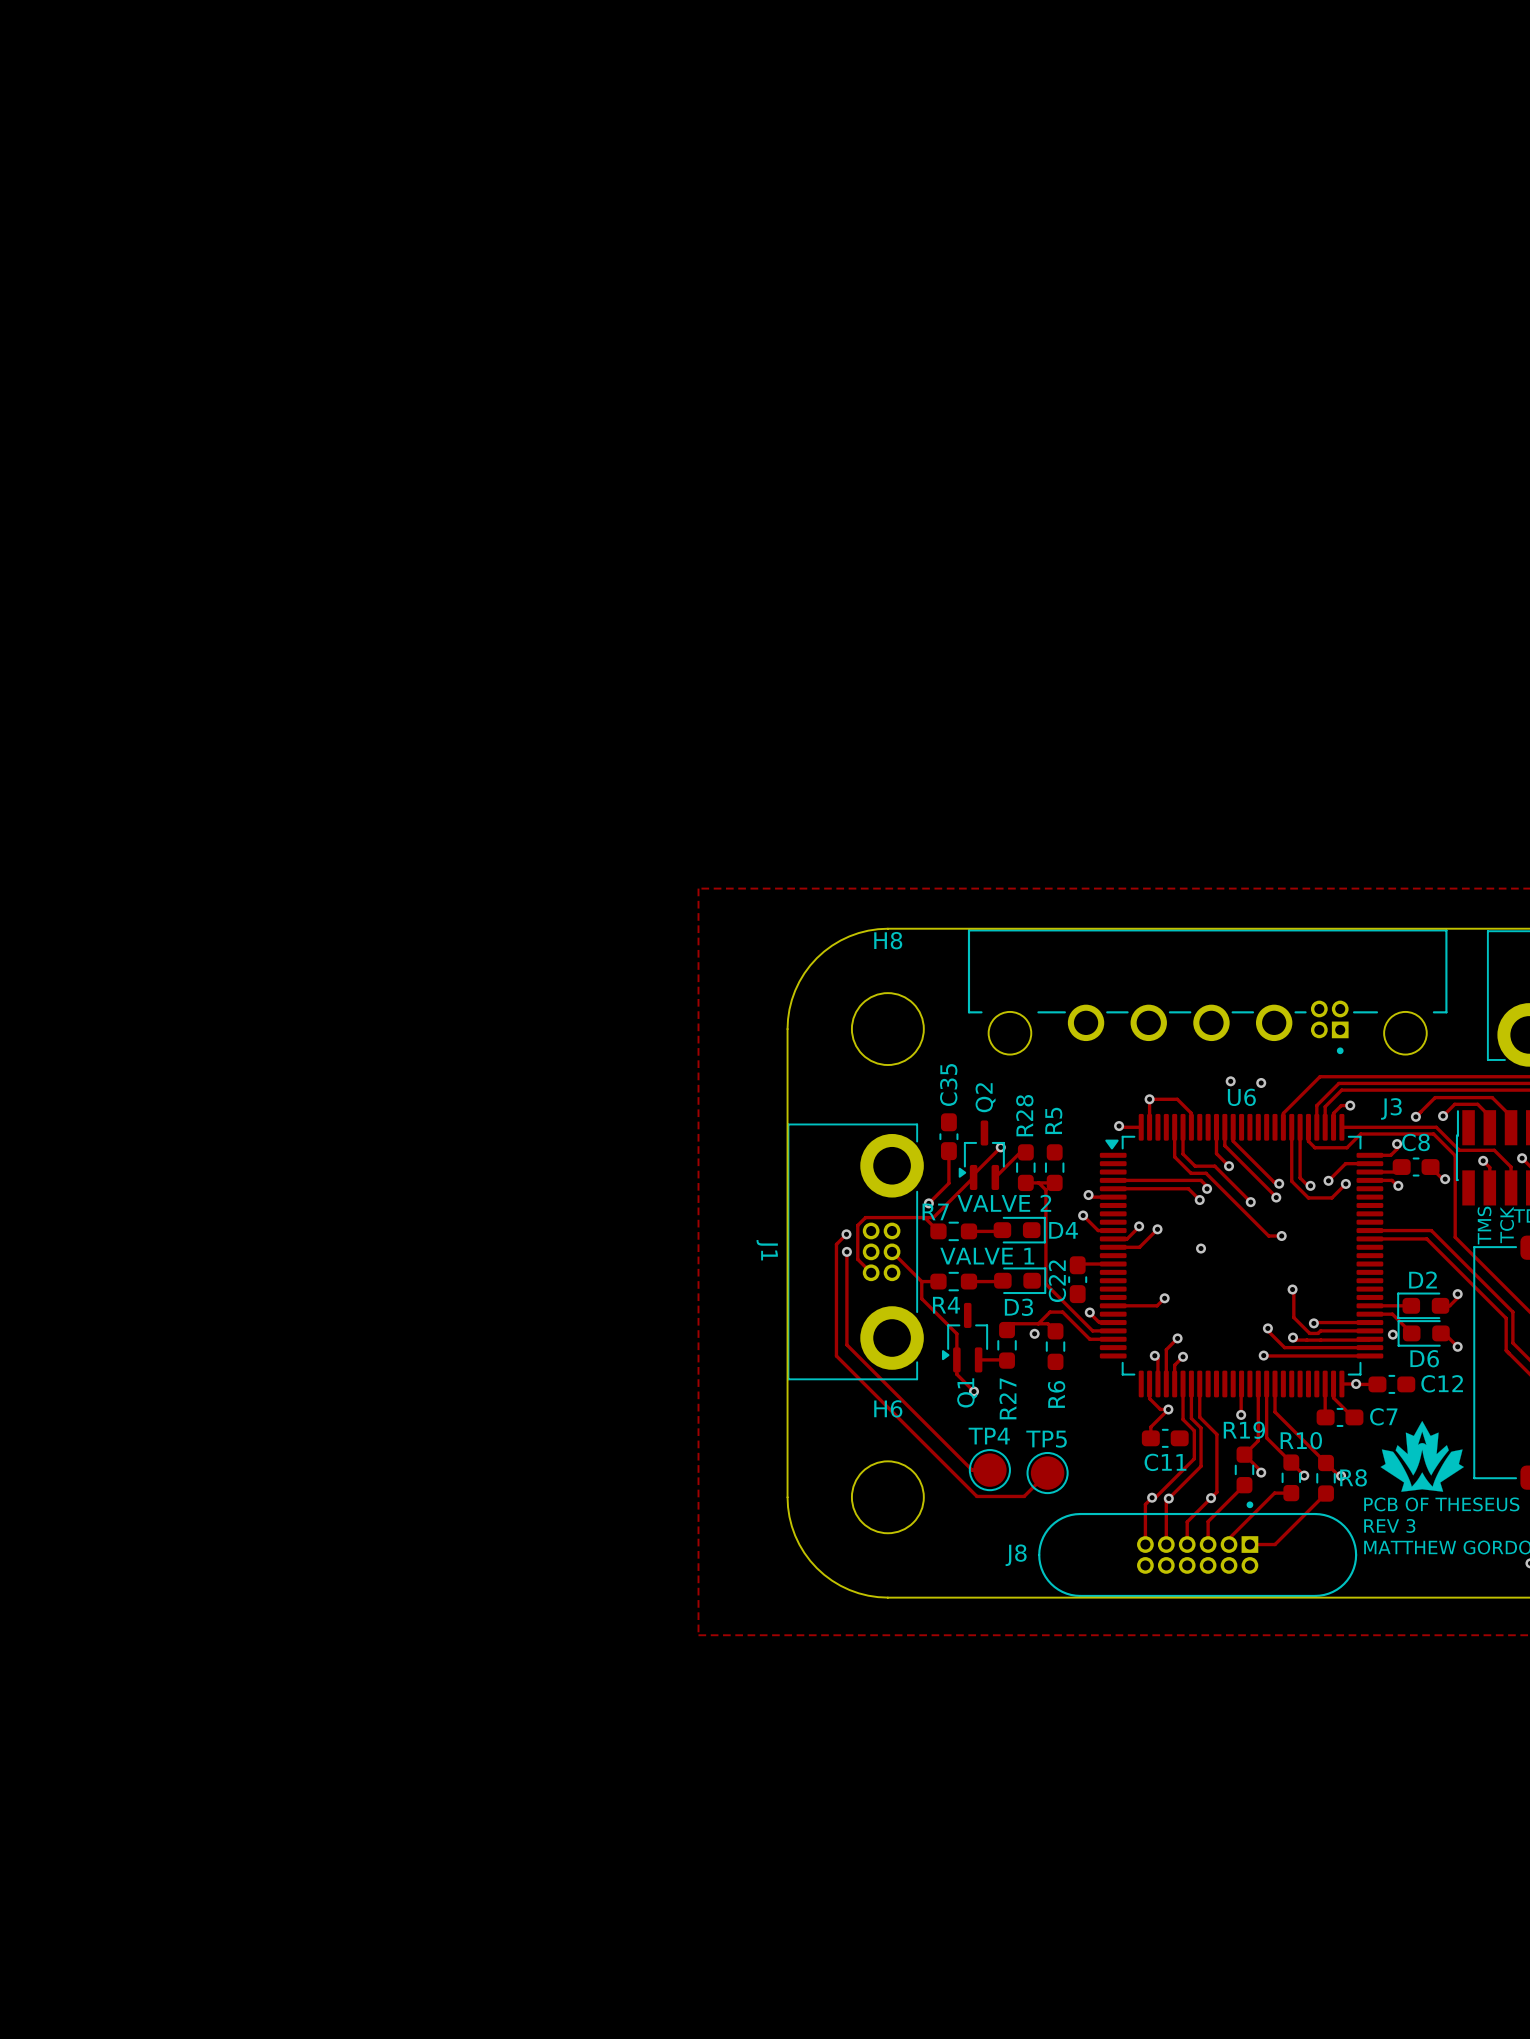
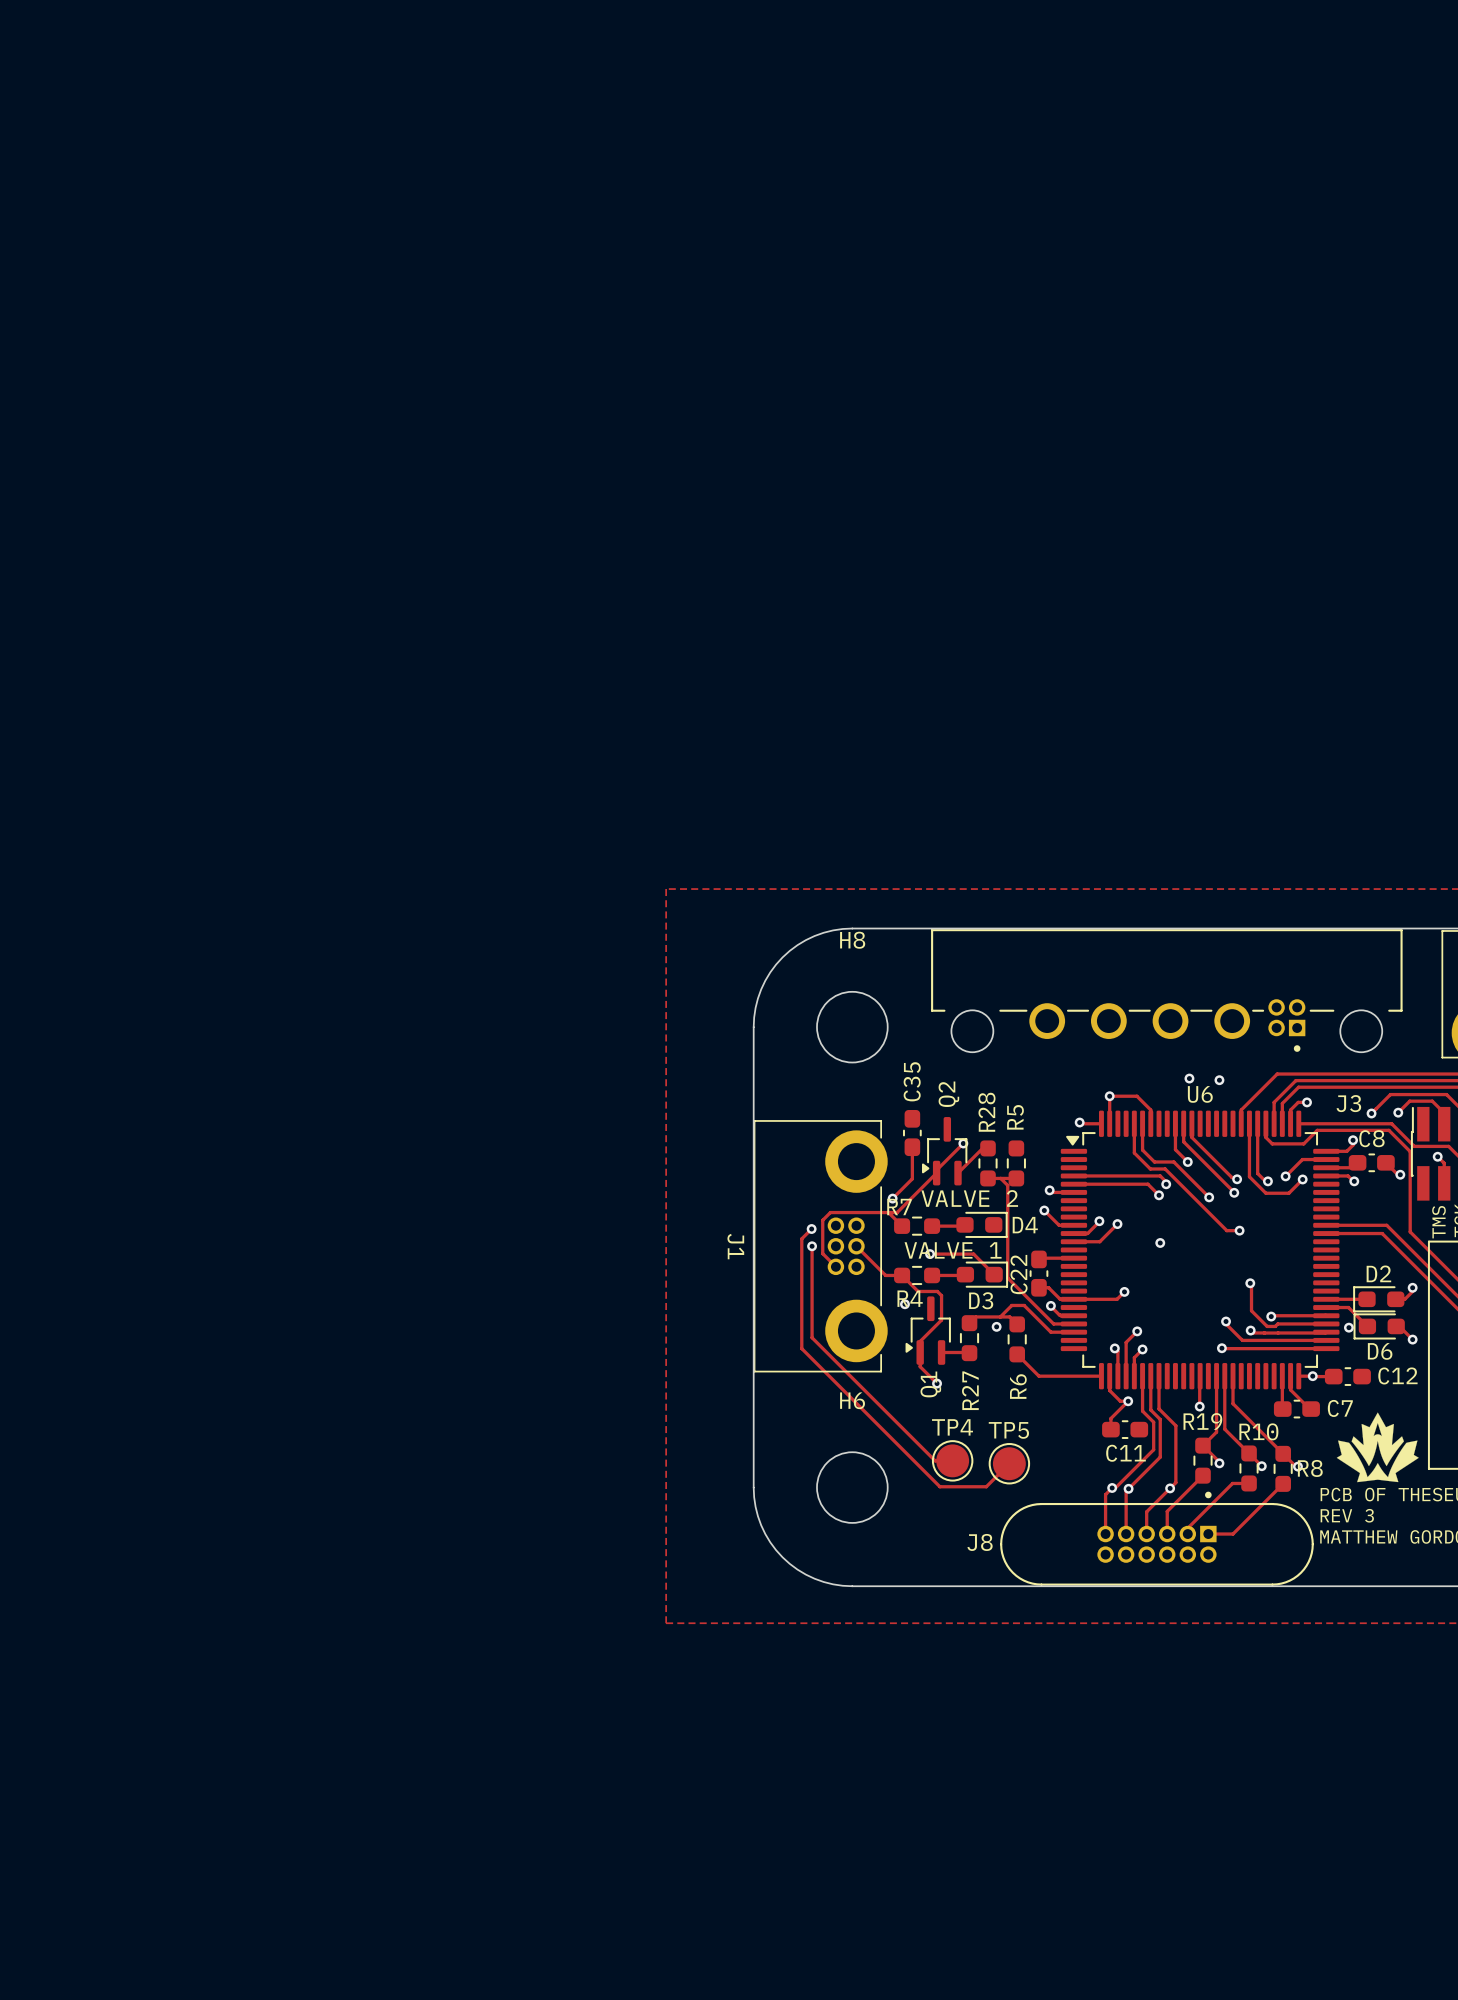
track: none -> (930, 1254) (973, 1254) (994, 1274)
via: none -> (930, 1254)
track: (921, 1281) (921, 1298) (956, 1333) (956, 1348) -> (902, 1275) (918, 1291) (937, 1291) (941, 1295) (941, 1320) (920, 1341)
track: none -> (1038, 1287) (1048, 1287) (1060, 1299) (1073, 1299)
via: none -> (904, 1304)
track: none -> (1017, 1354) (1038, 1376) (1101, 1376)

